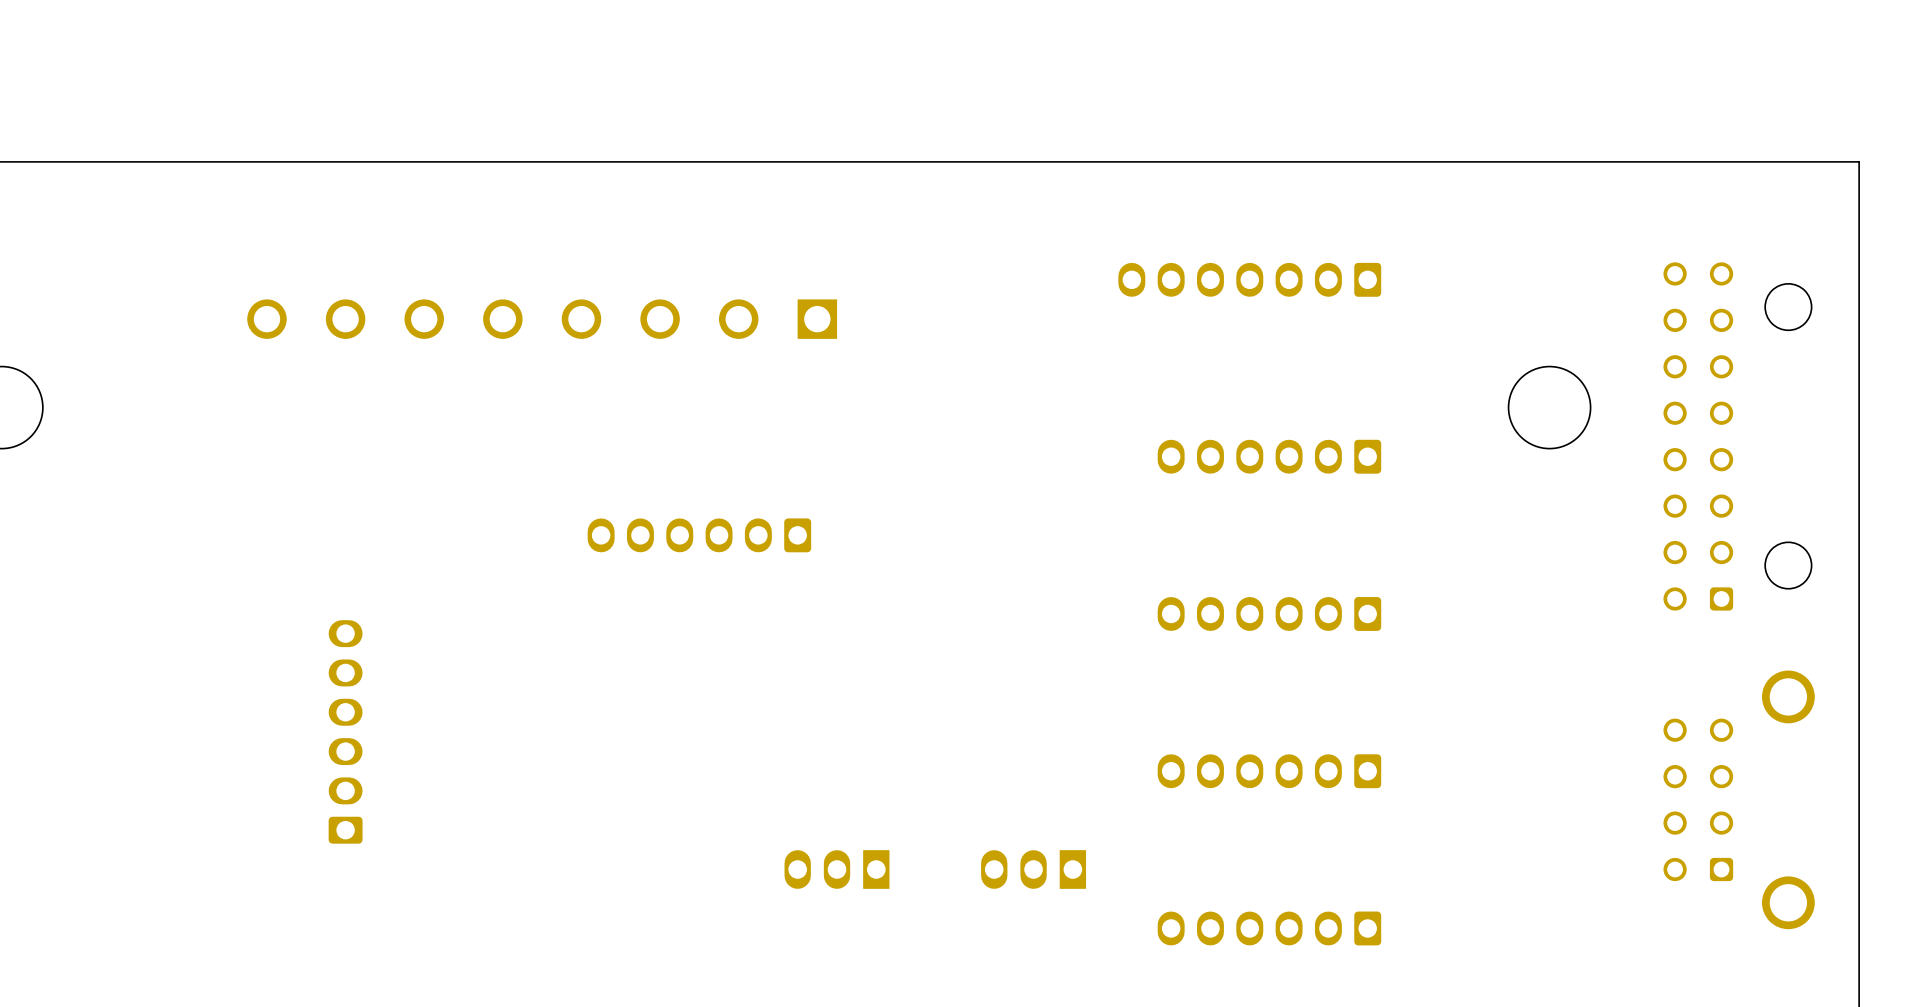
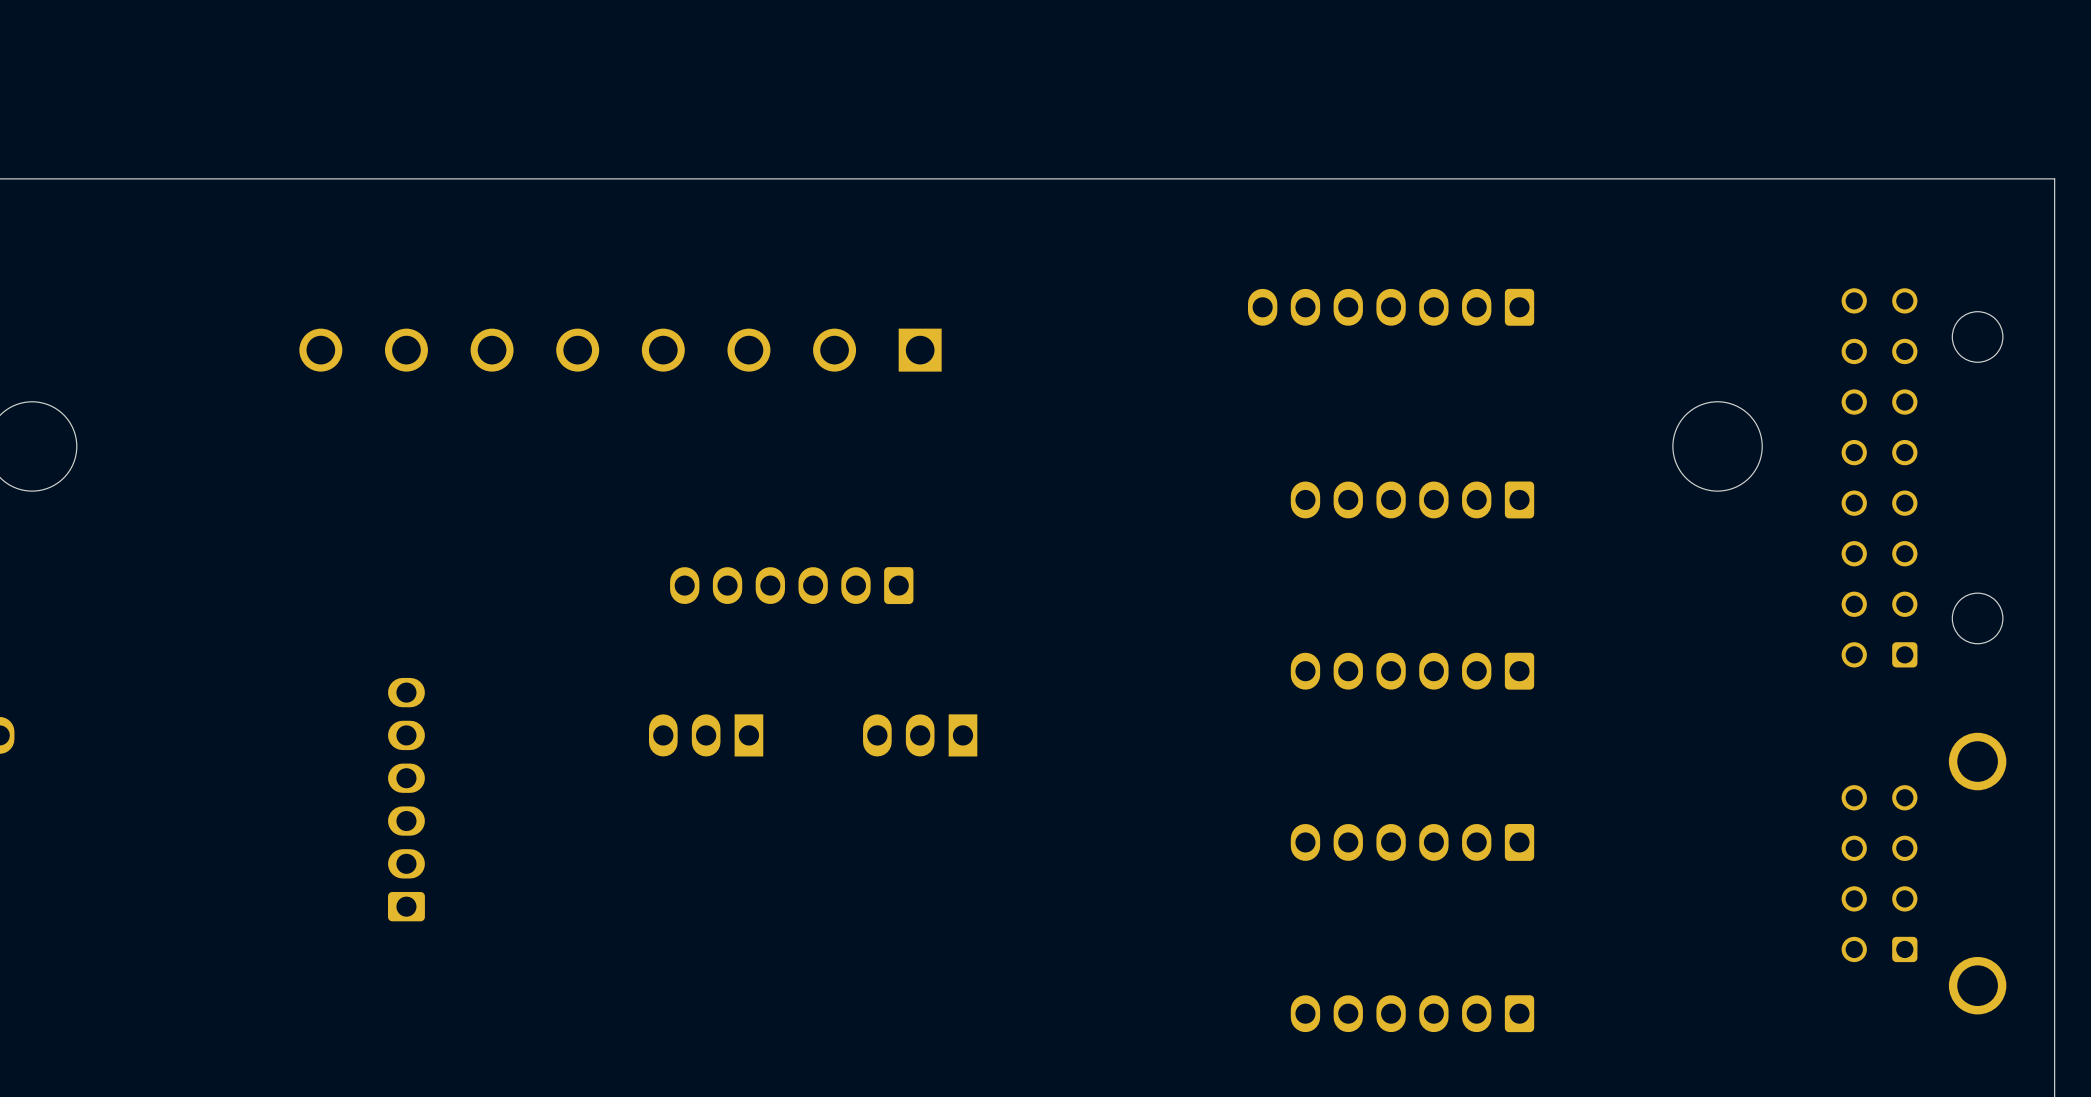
part: none -> (706, 735)
part: none -> (920, 735)
part: (837, 869) -> none
part: (1033, 869) -> none

